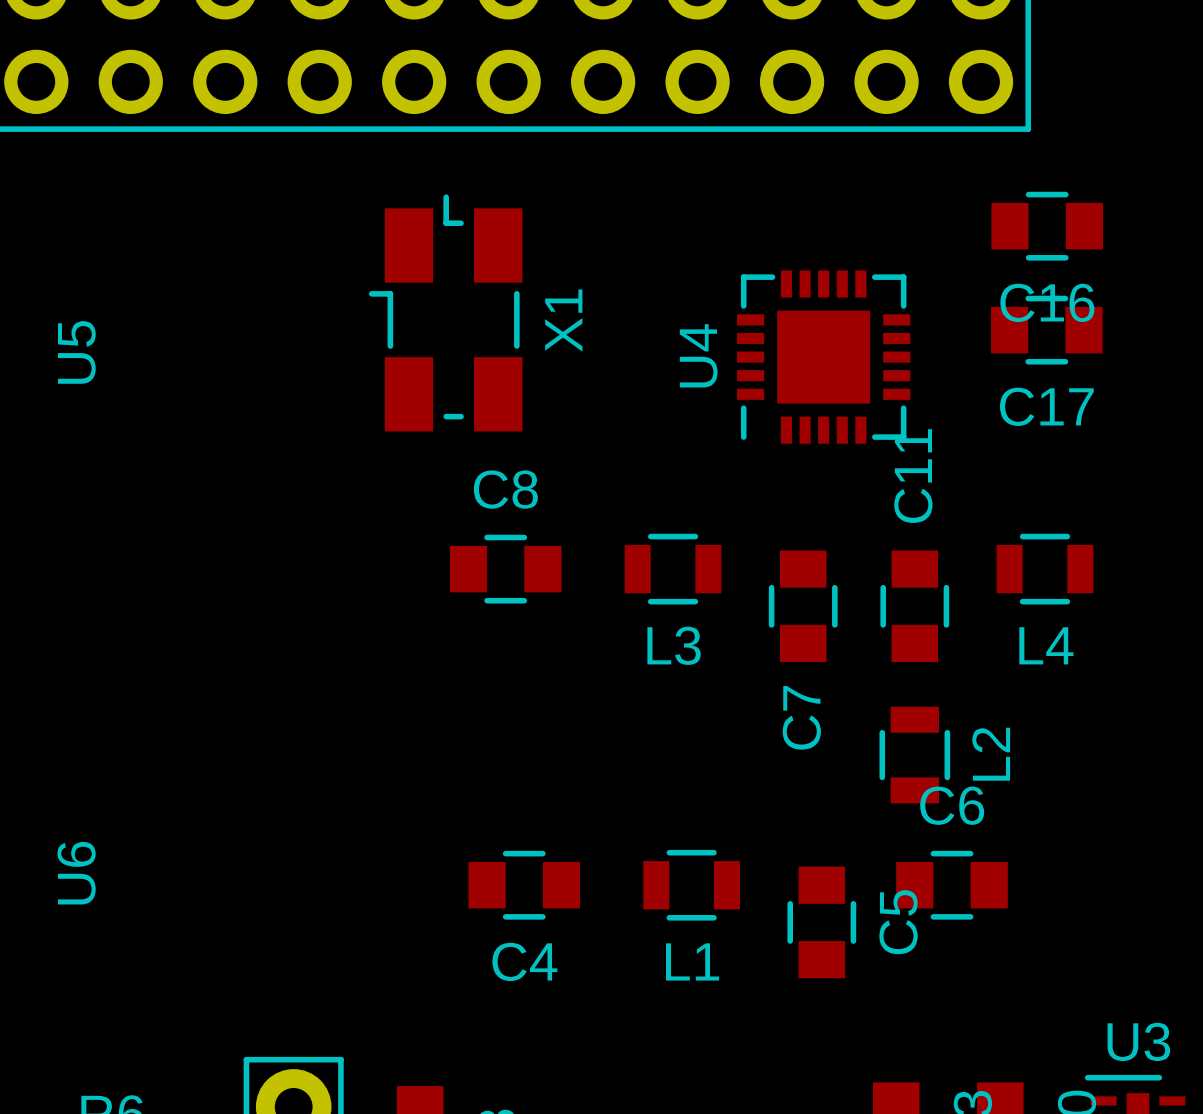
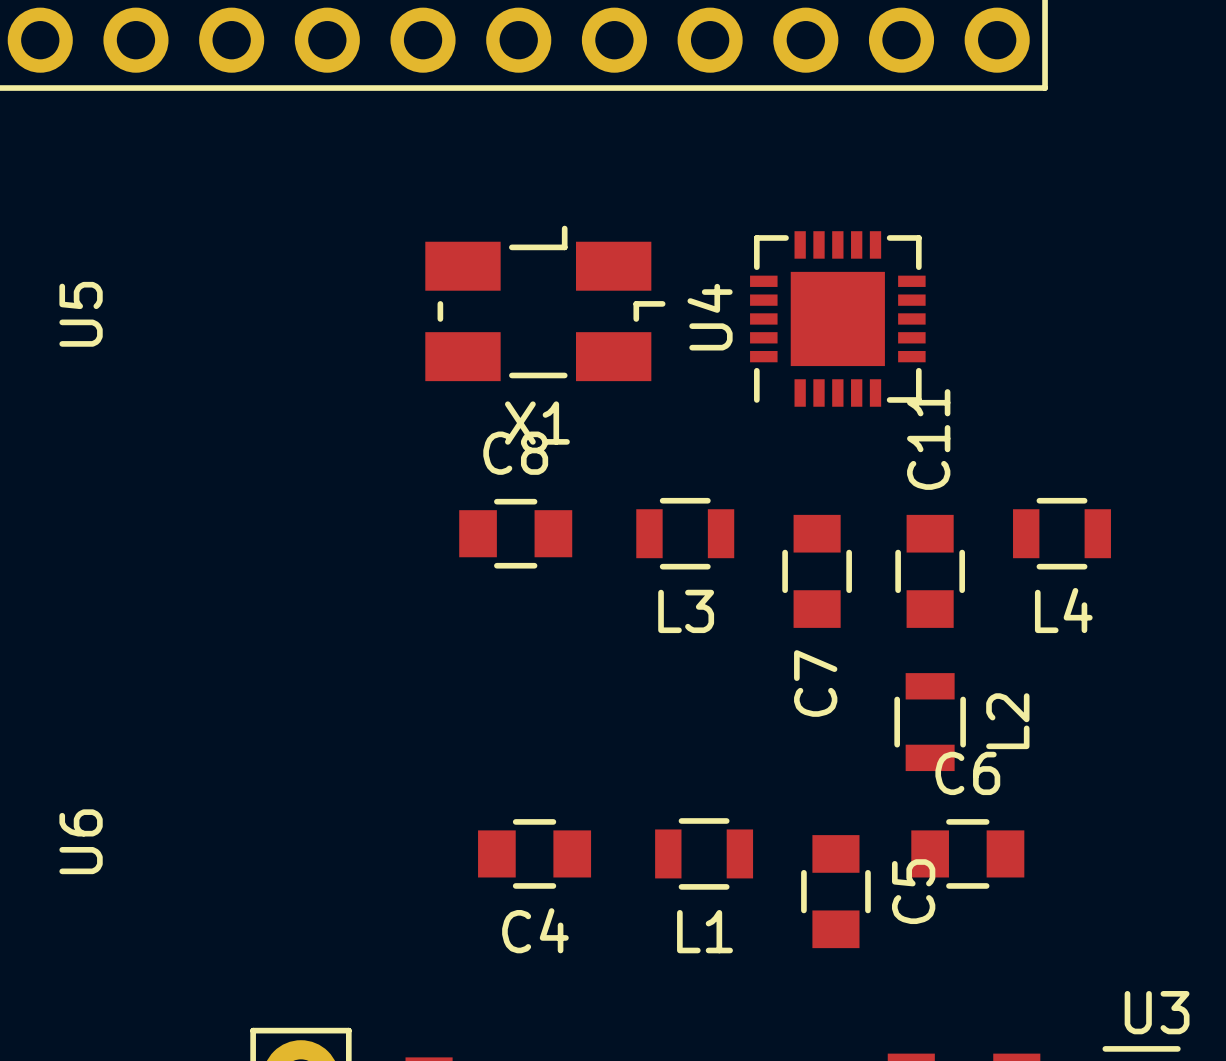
C16: (1047, 226) -> none
X1 rotation: 0° (445, 312) -> 90° clockwise (545, 303)
C17: (1046, 330) -> none

